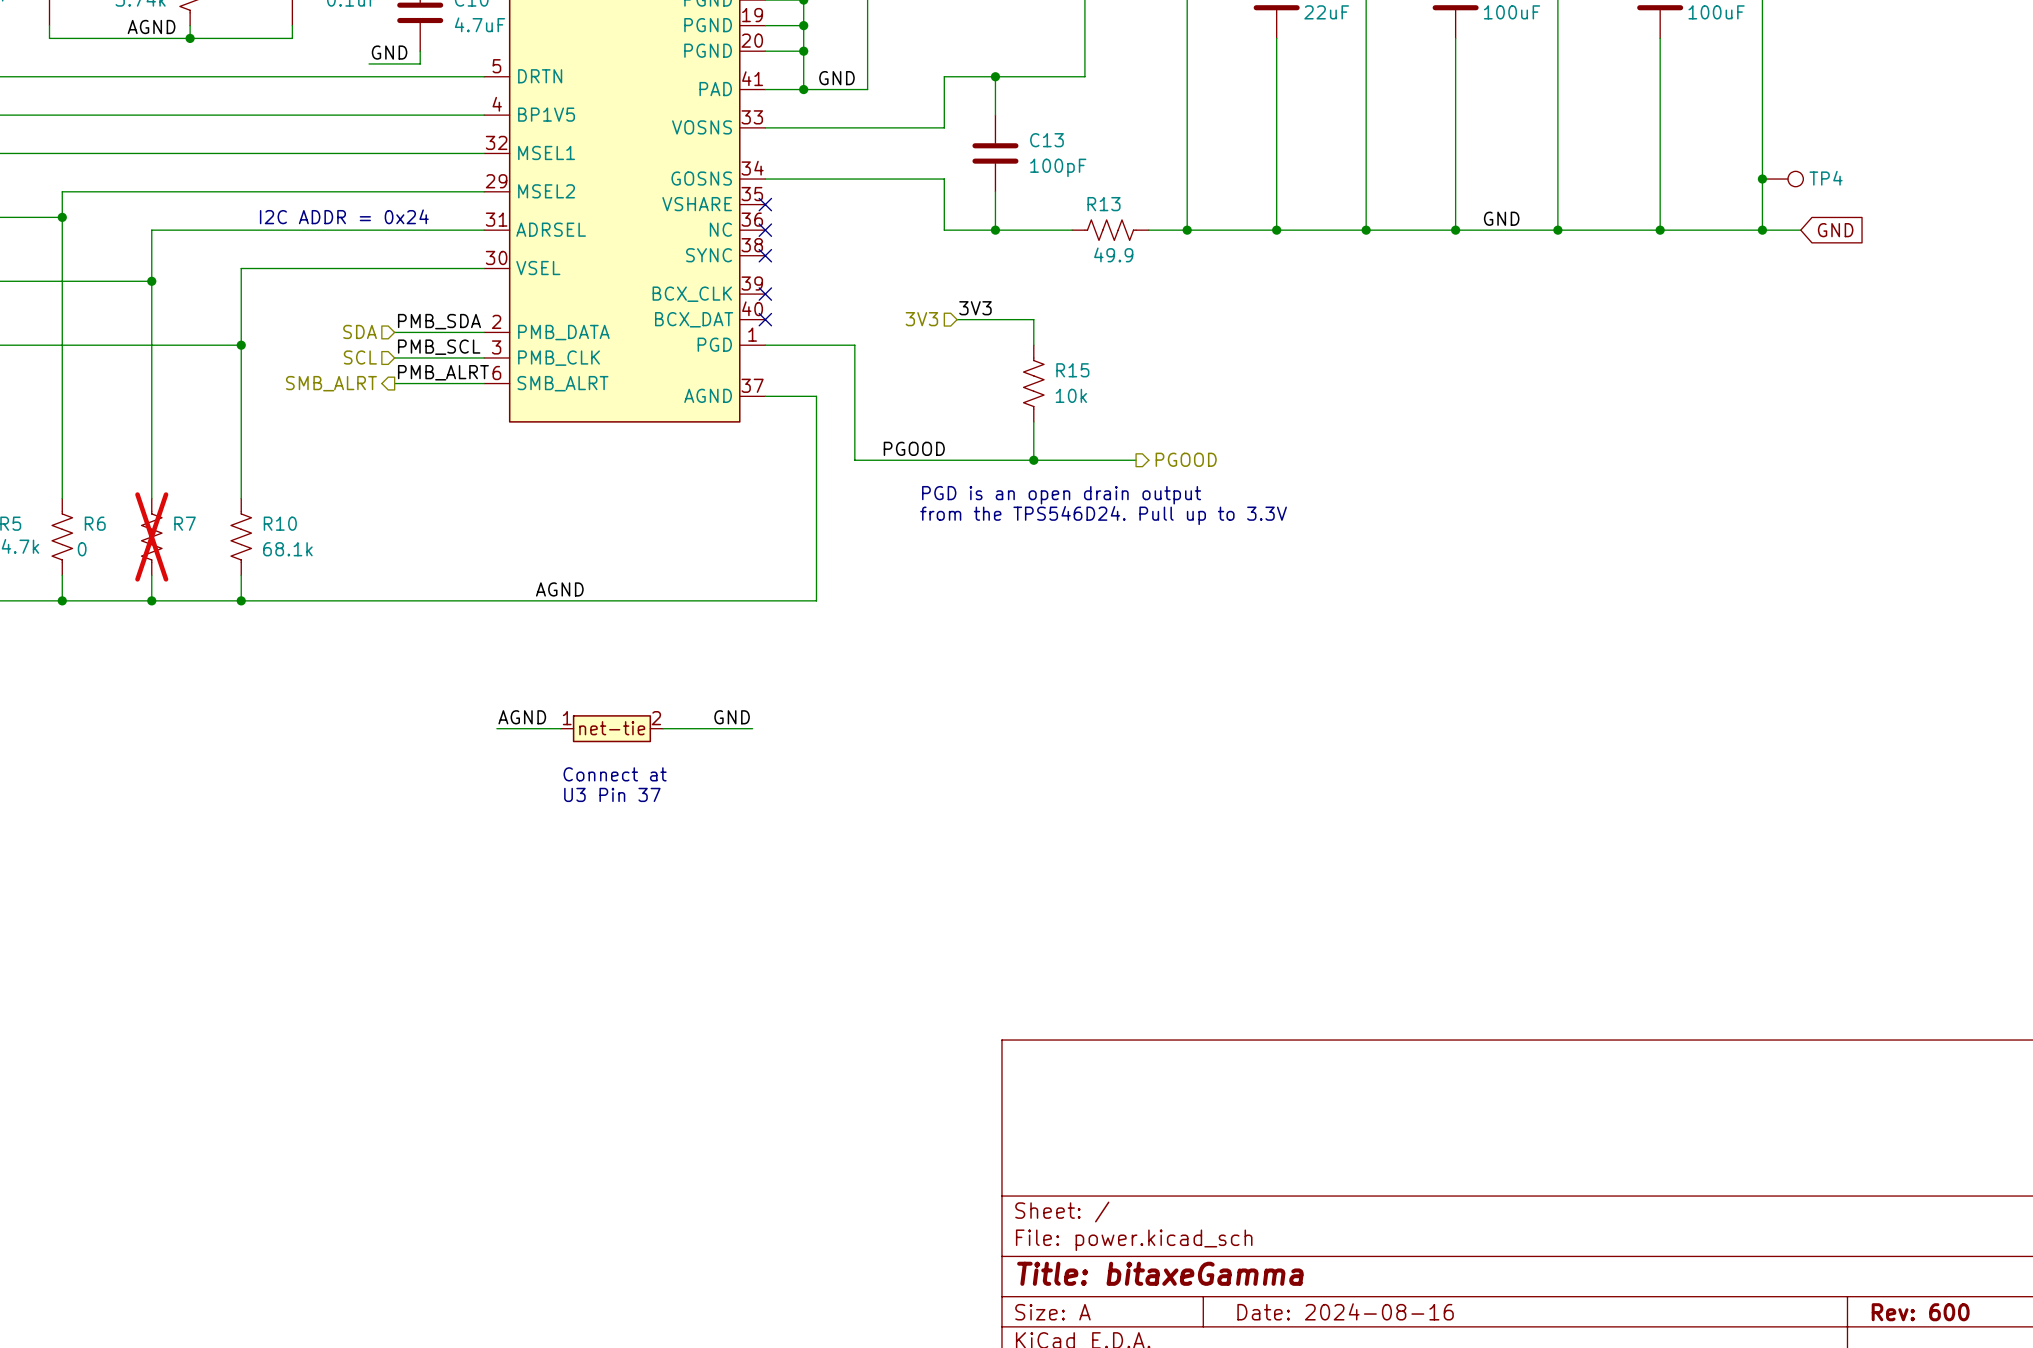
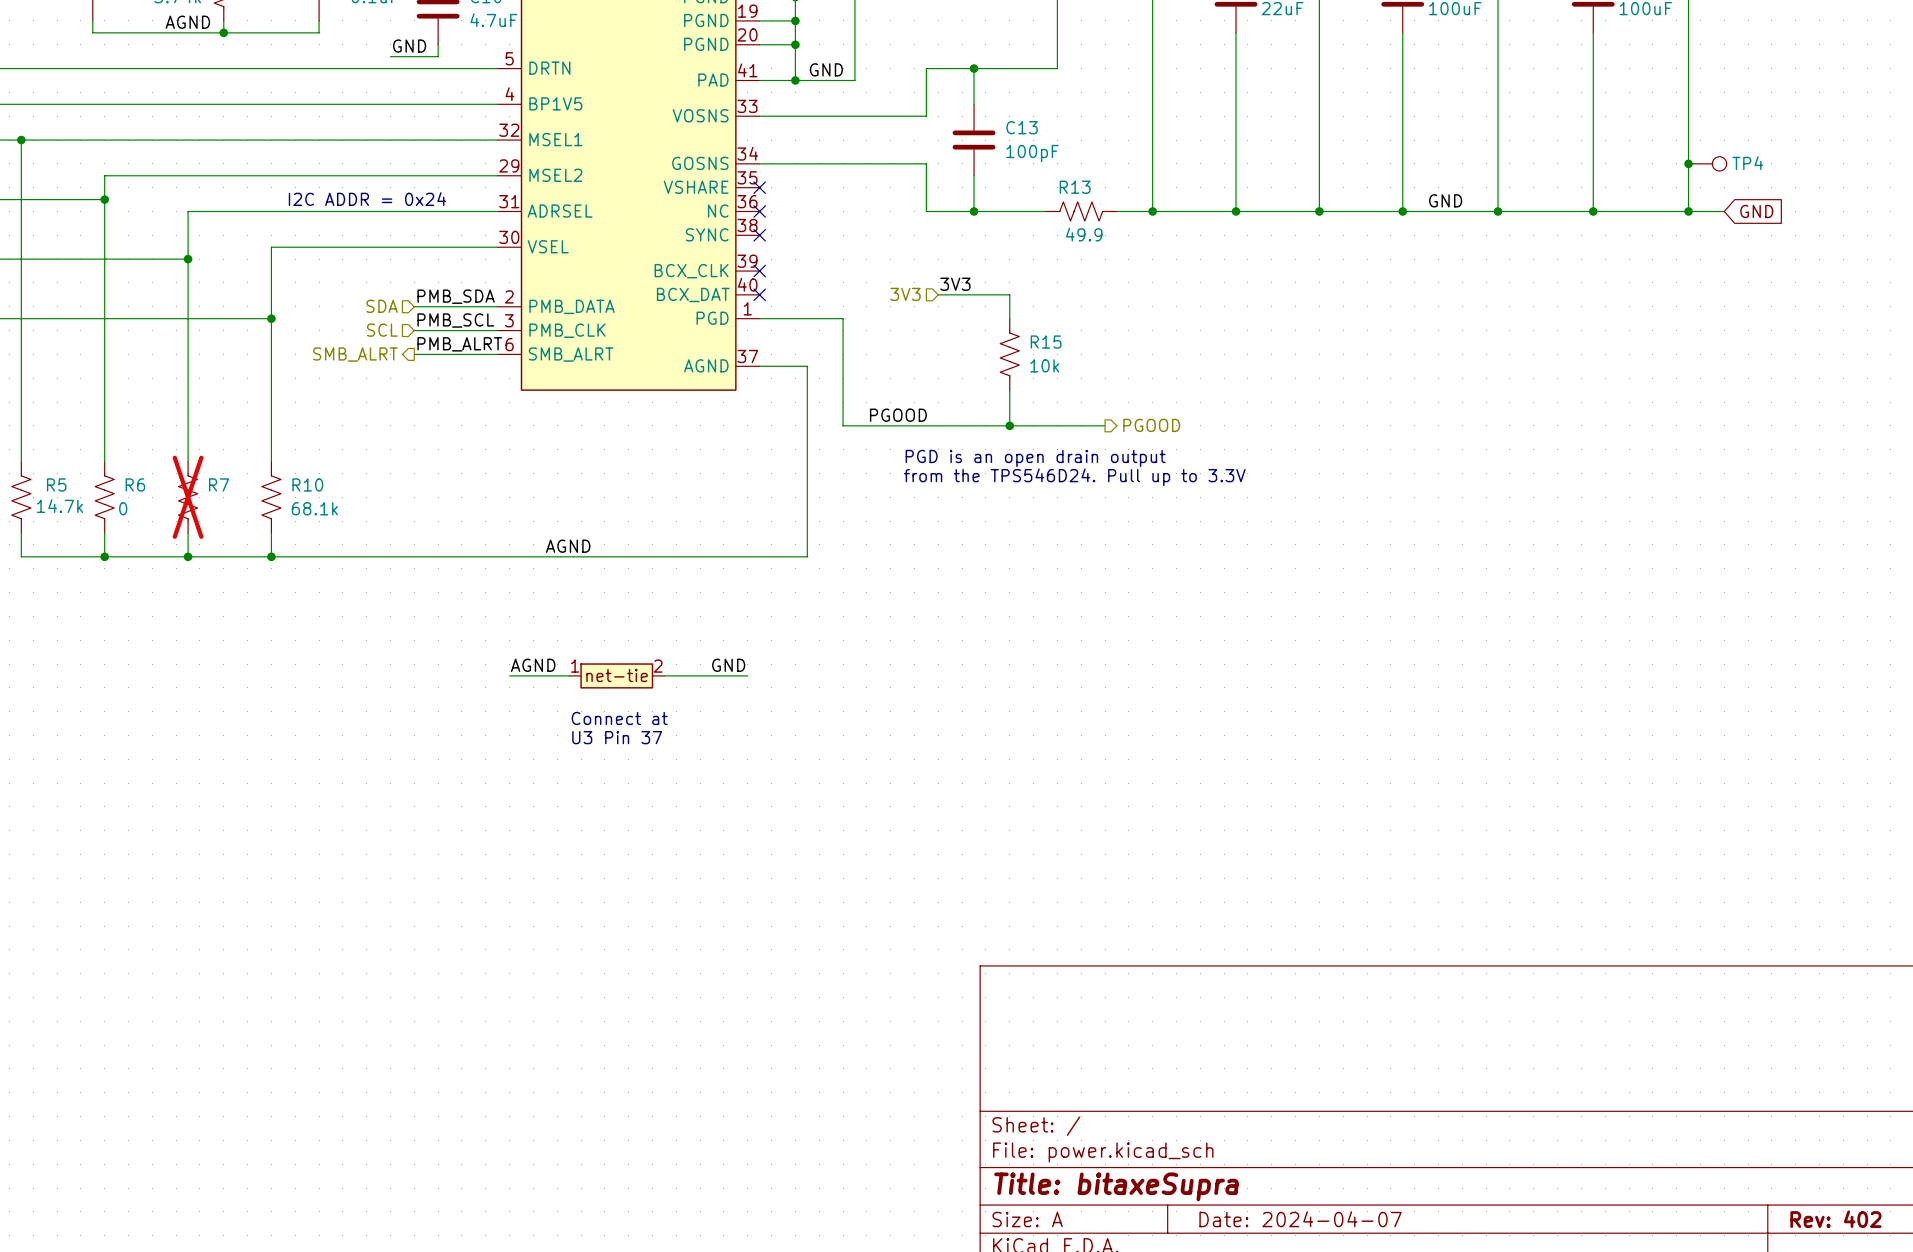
title block: Title: bitaxeGamma (1160, 1273) -> Title: bitaxeSupra (1116, 1186)
title block: Date: 2024-08-16 (1345, 1311) -> Date: 2024-04-07 (1300, 1219)
title block: Rev: 600 (1920, 1312) -> Rev: 402 (1835, 1219)

